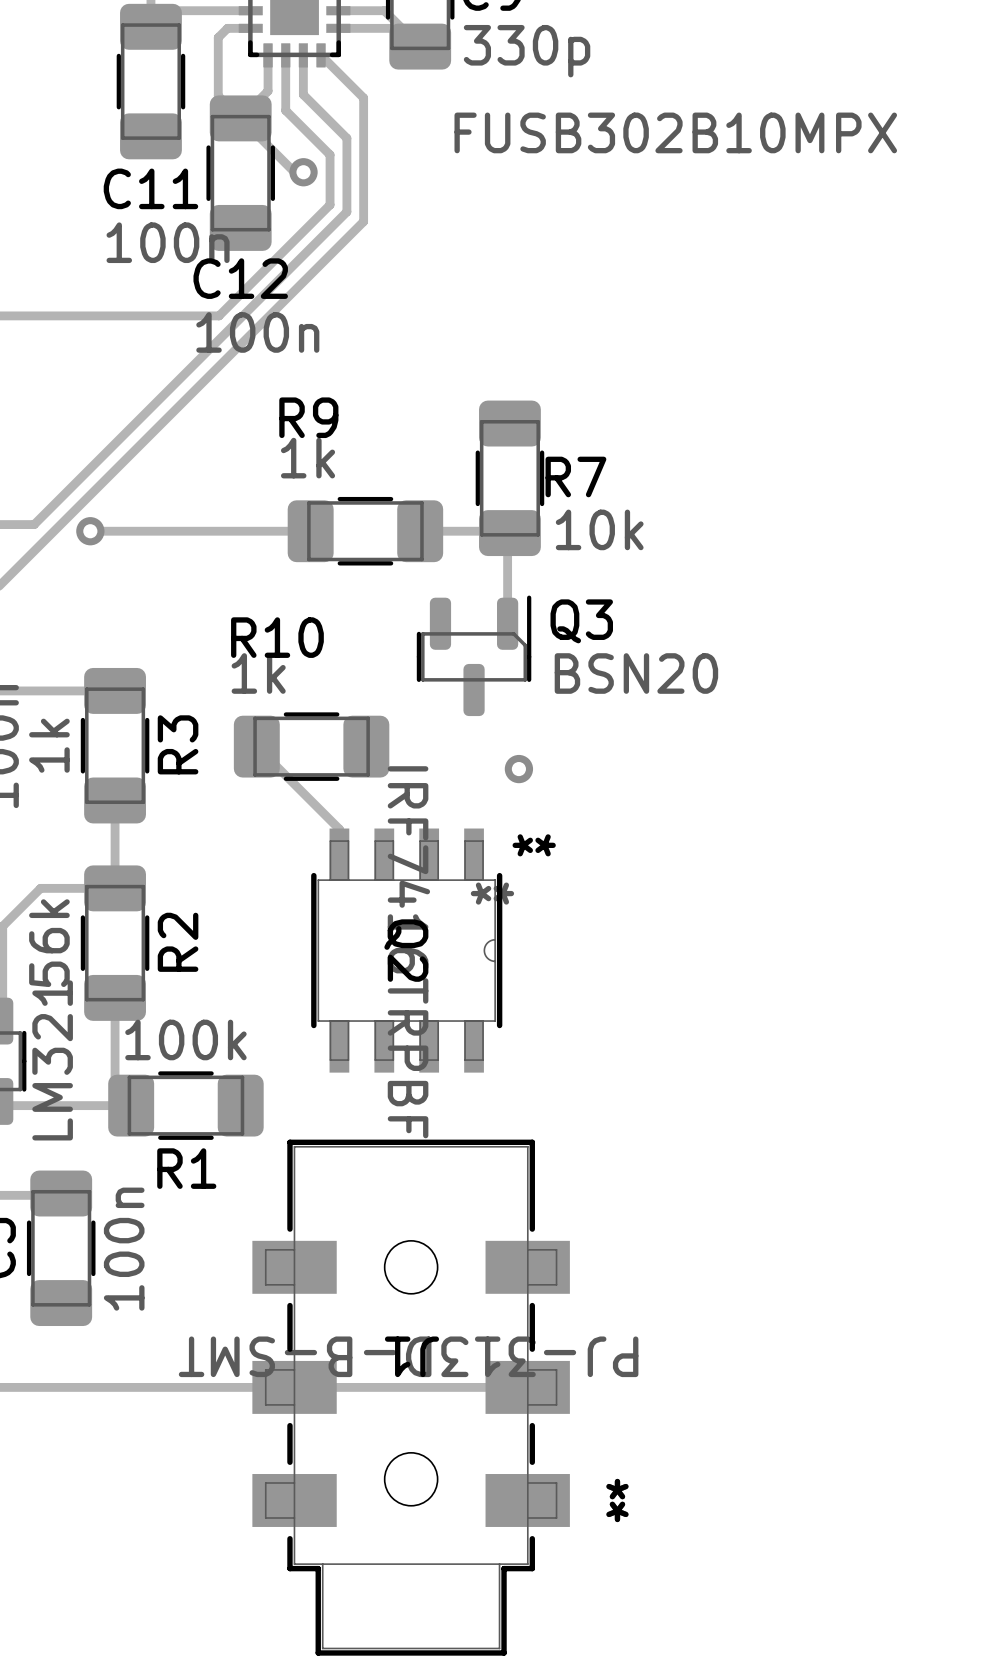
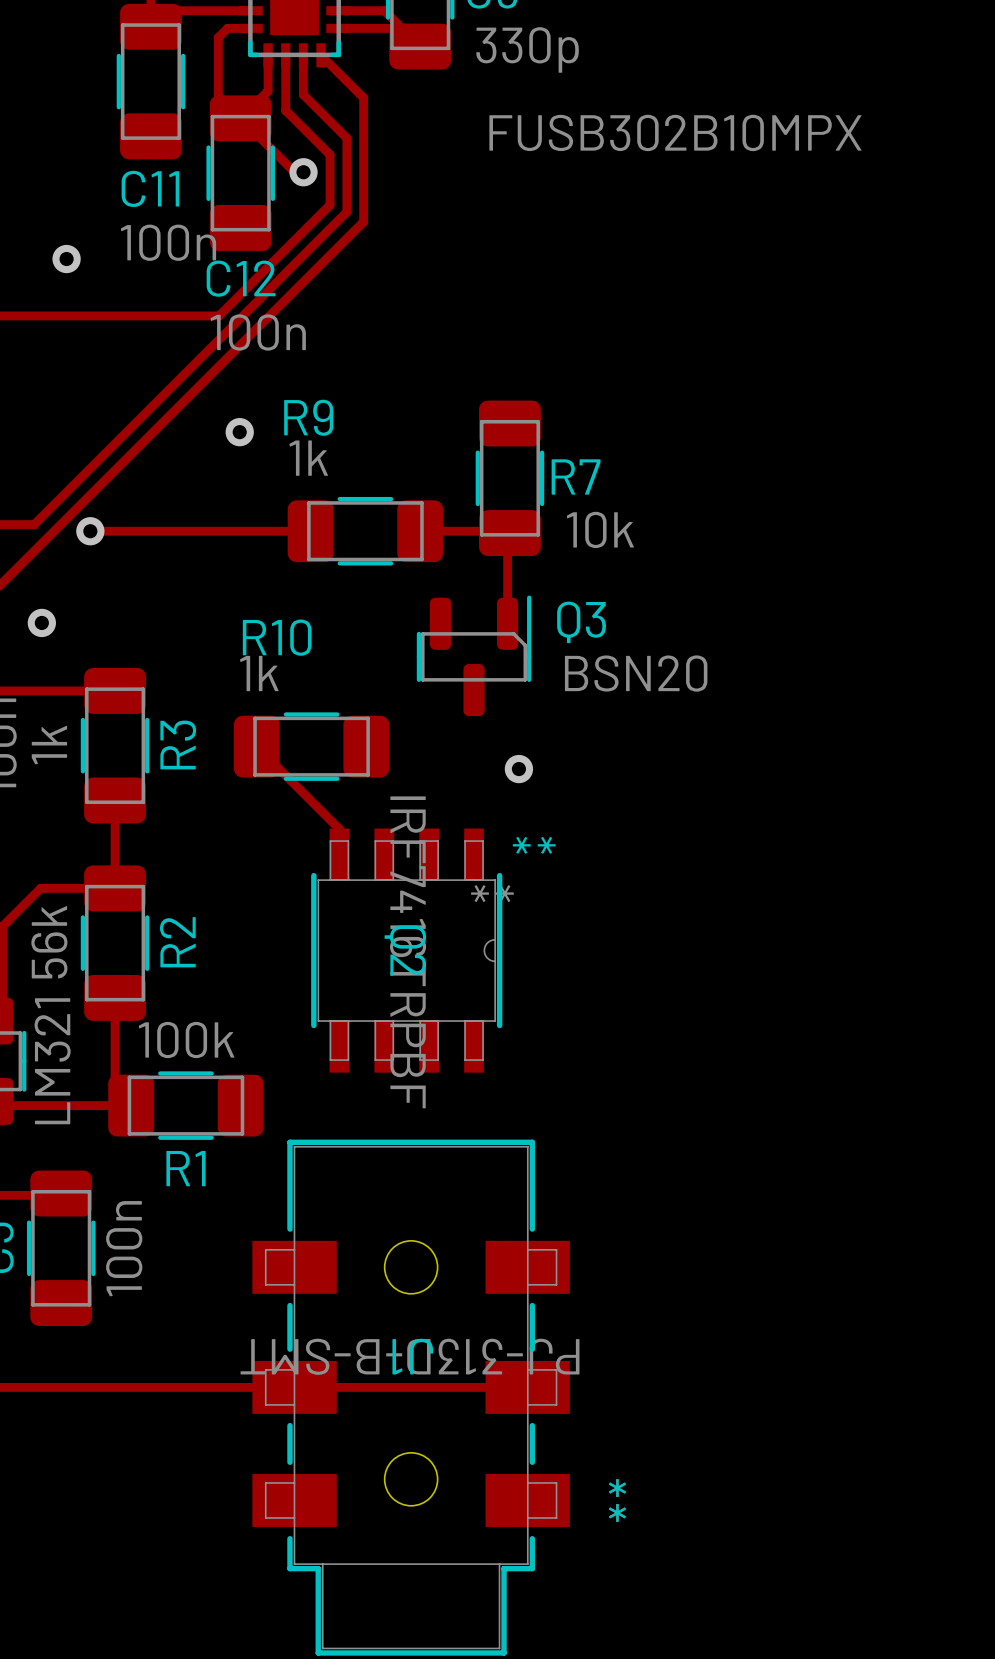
via: none -> (66, 259)
via: none -> (239, 432)
via: none -> (41, 622)

